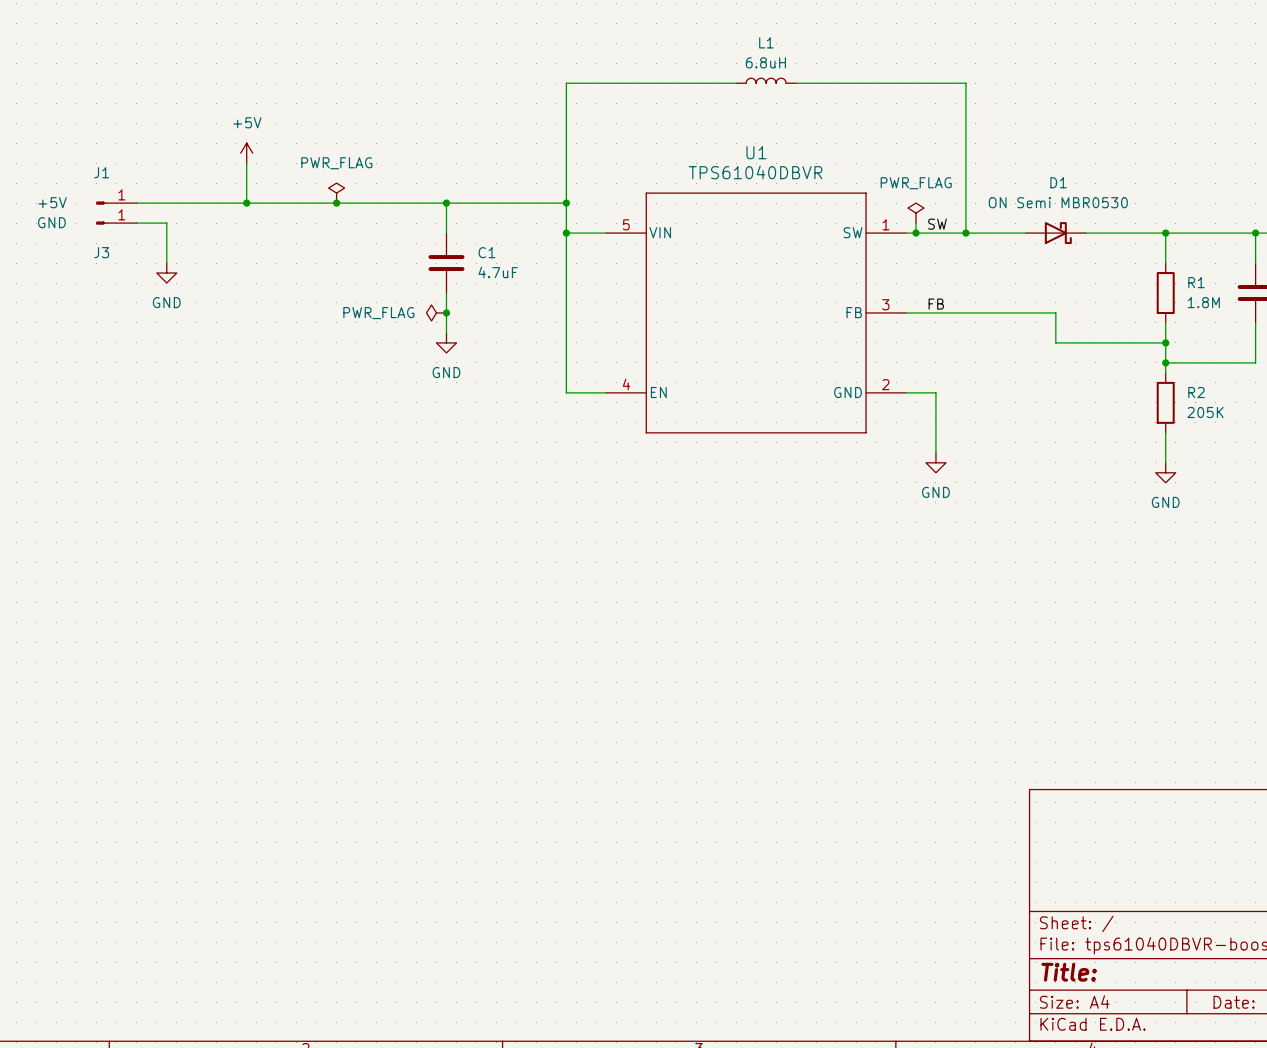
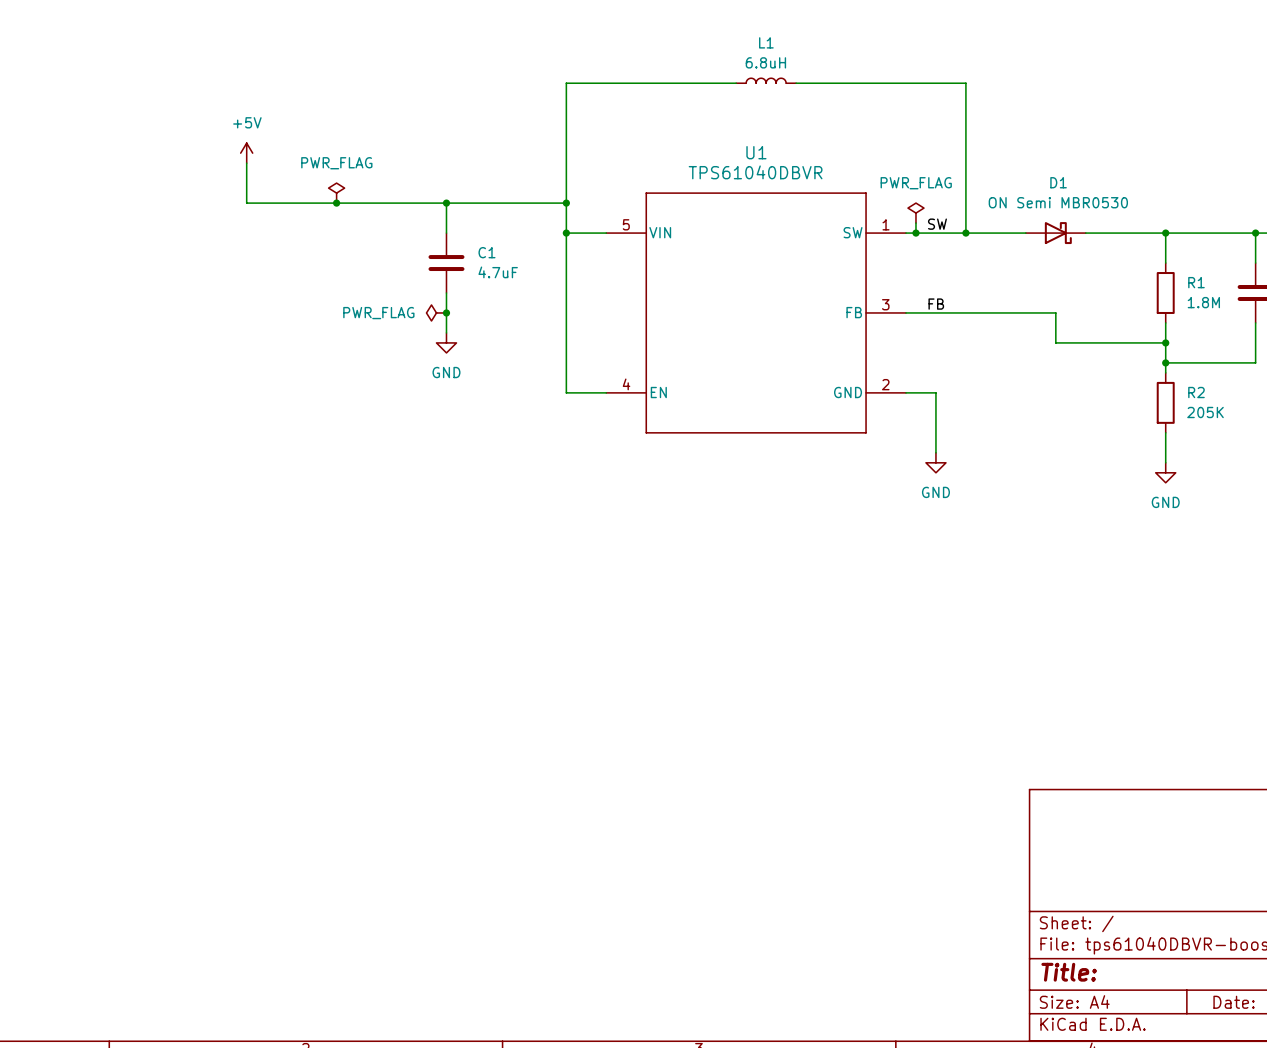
J1: +5V (116, 203) -> none
wire: (136, 203) (246, 203) -> none
junction: (246, 203) -> none
J3: GND (116, 223) -> none
wire: (136, 223) (166, 223) (166, 263) -> none
power symbol: GND (166, 273) -> none

